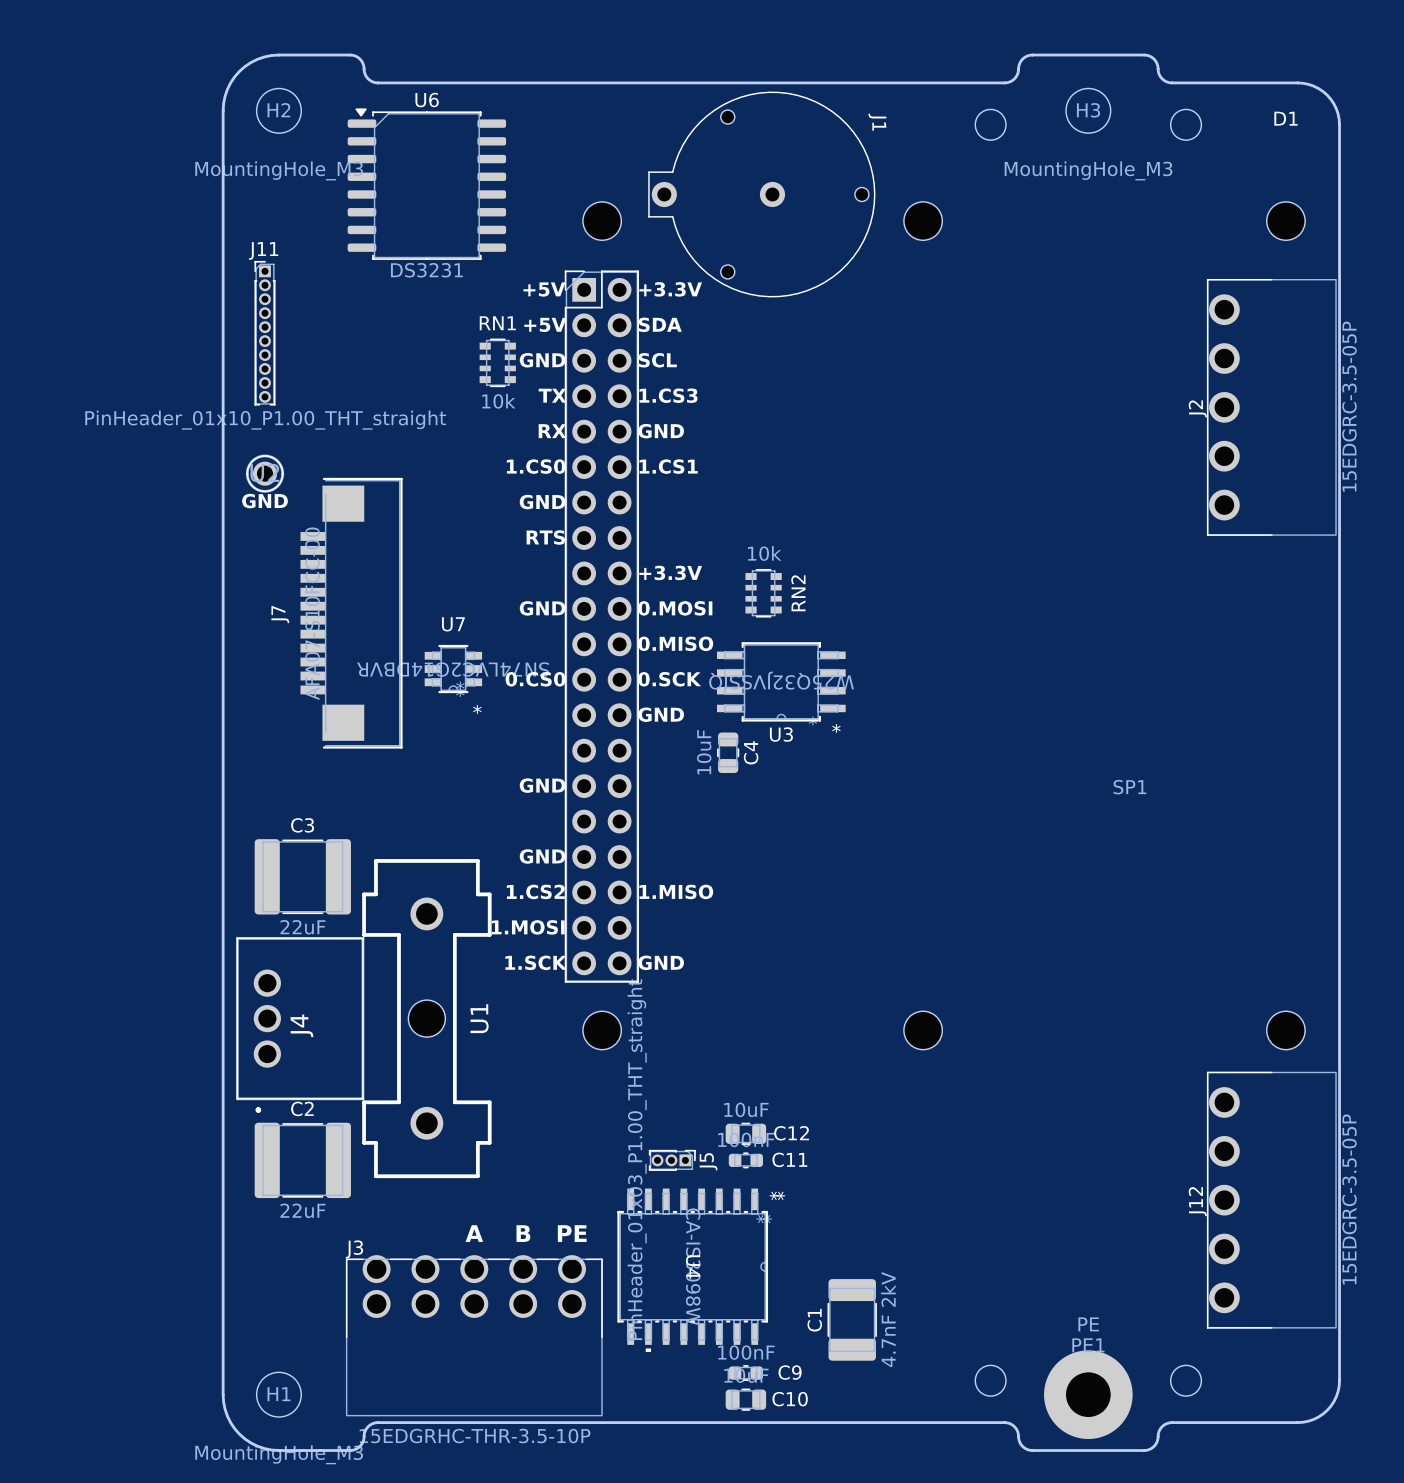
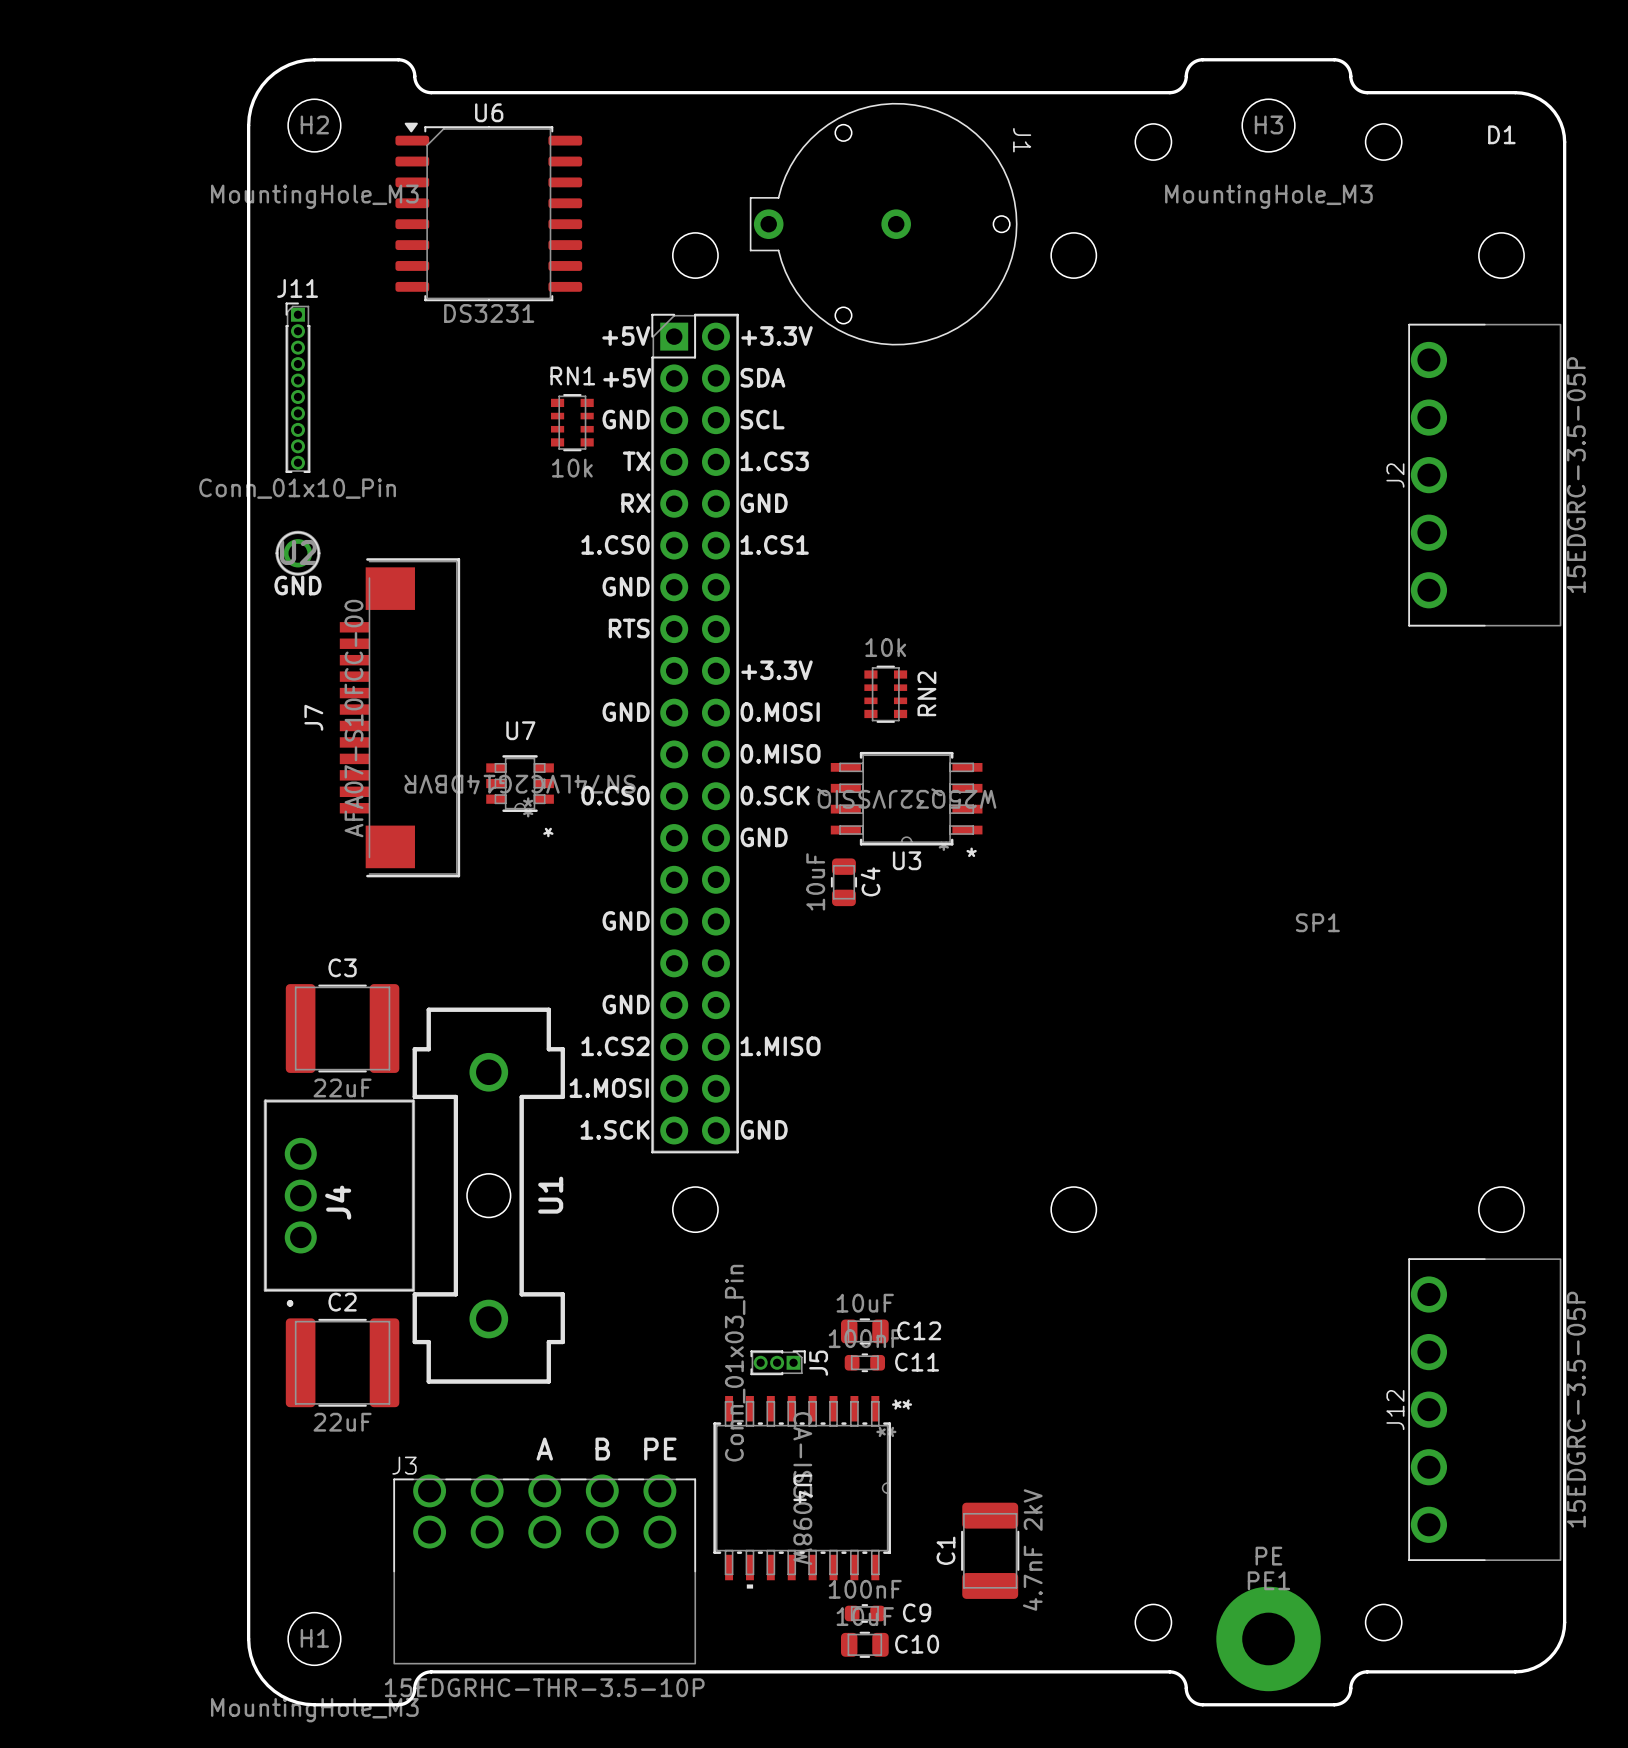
J11 value: PinHeader_01x10_P1.00_THT_straight (265, 420) -> Conn_01x10_Pin (297, 488)
J5 value: PinHeader_01x03_P1.00_THT_straight (637, 1159) -> Conn_01x03_Pin (735, 1363)

